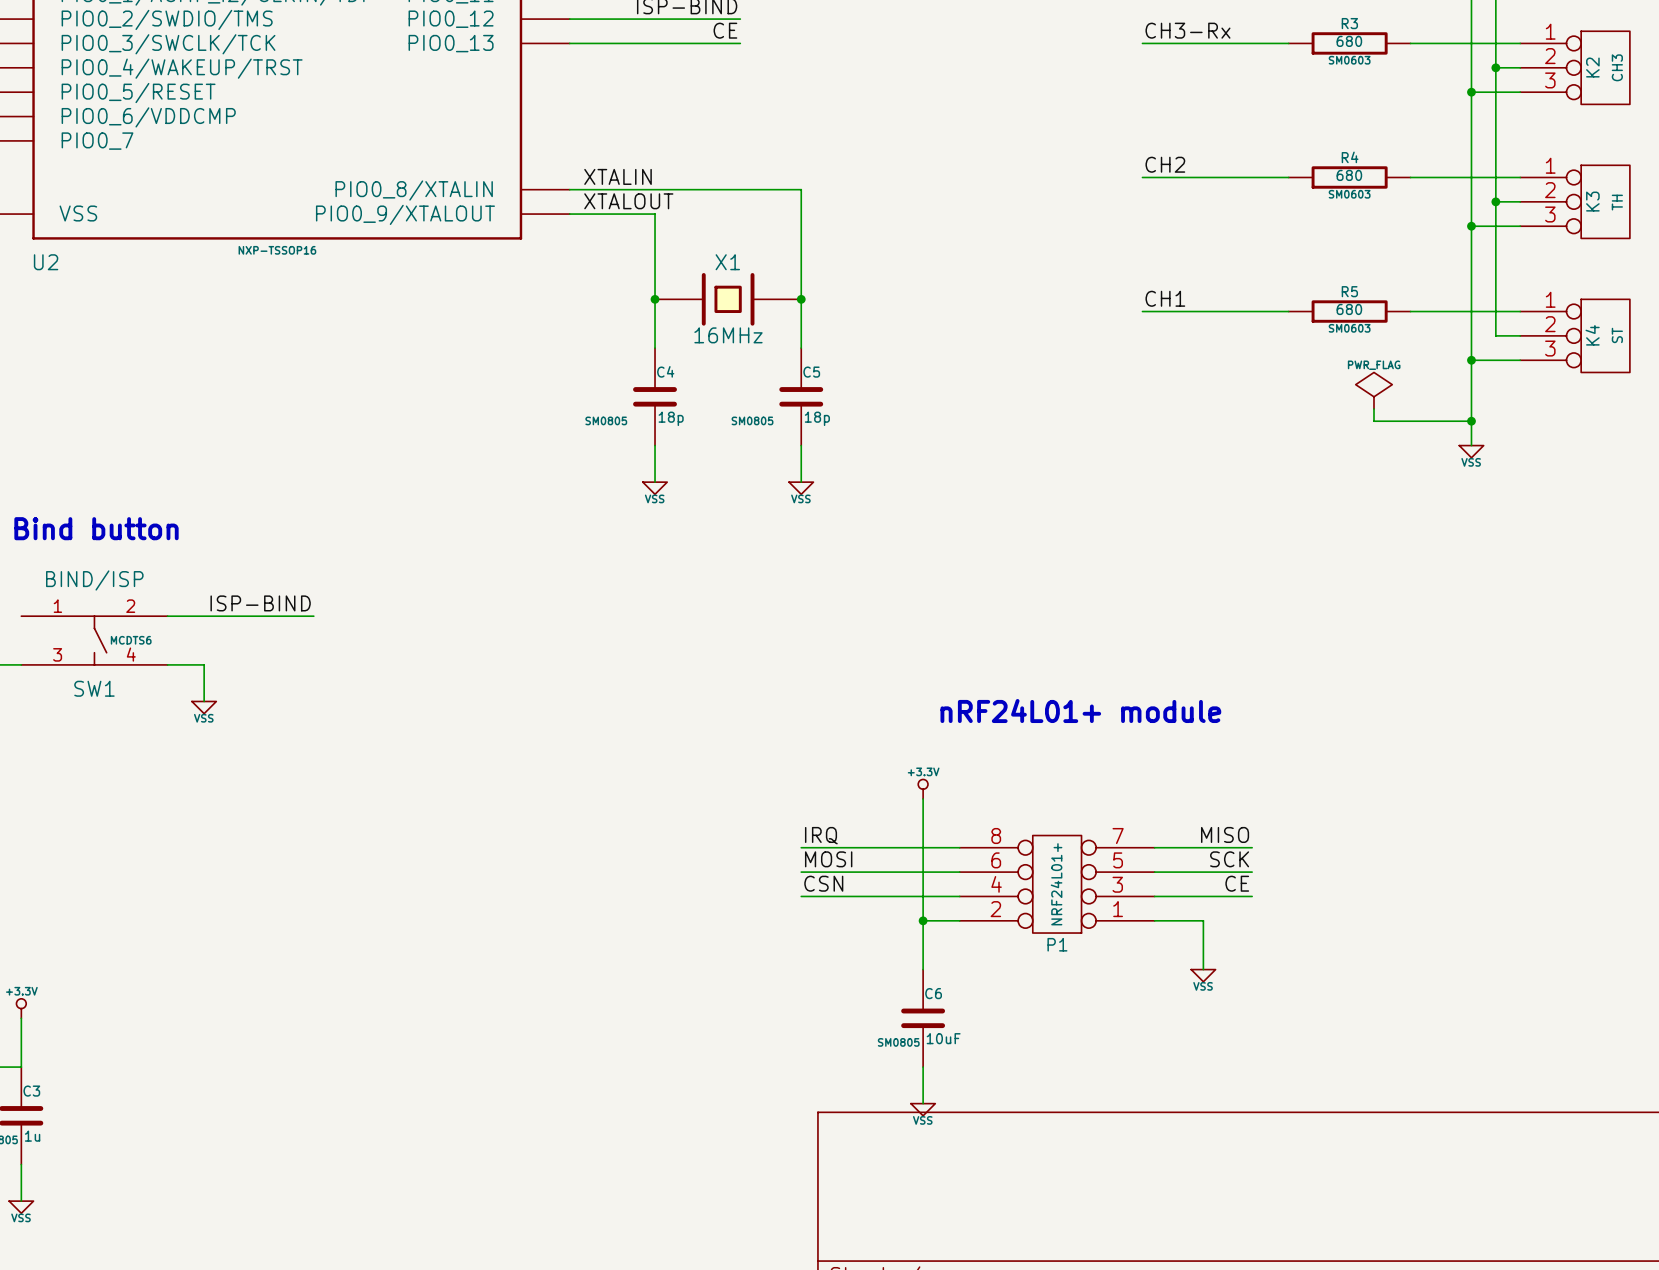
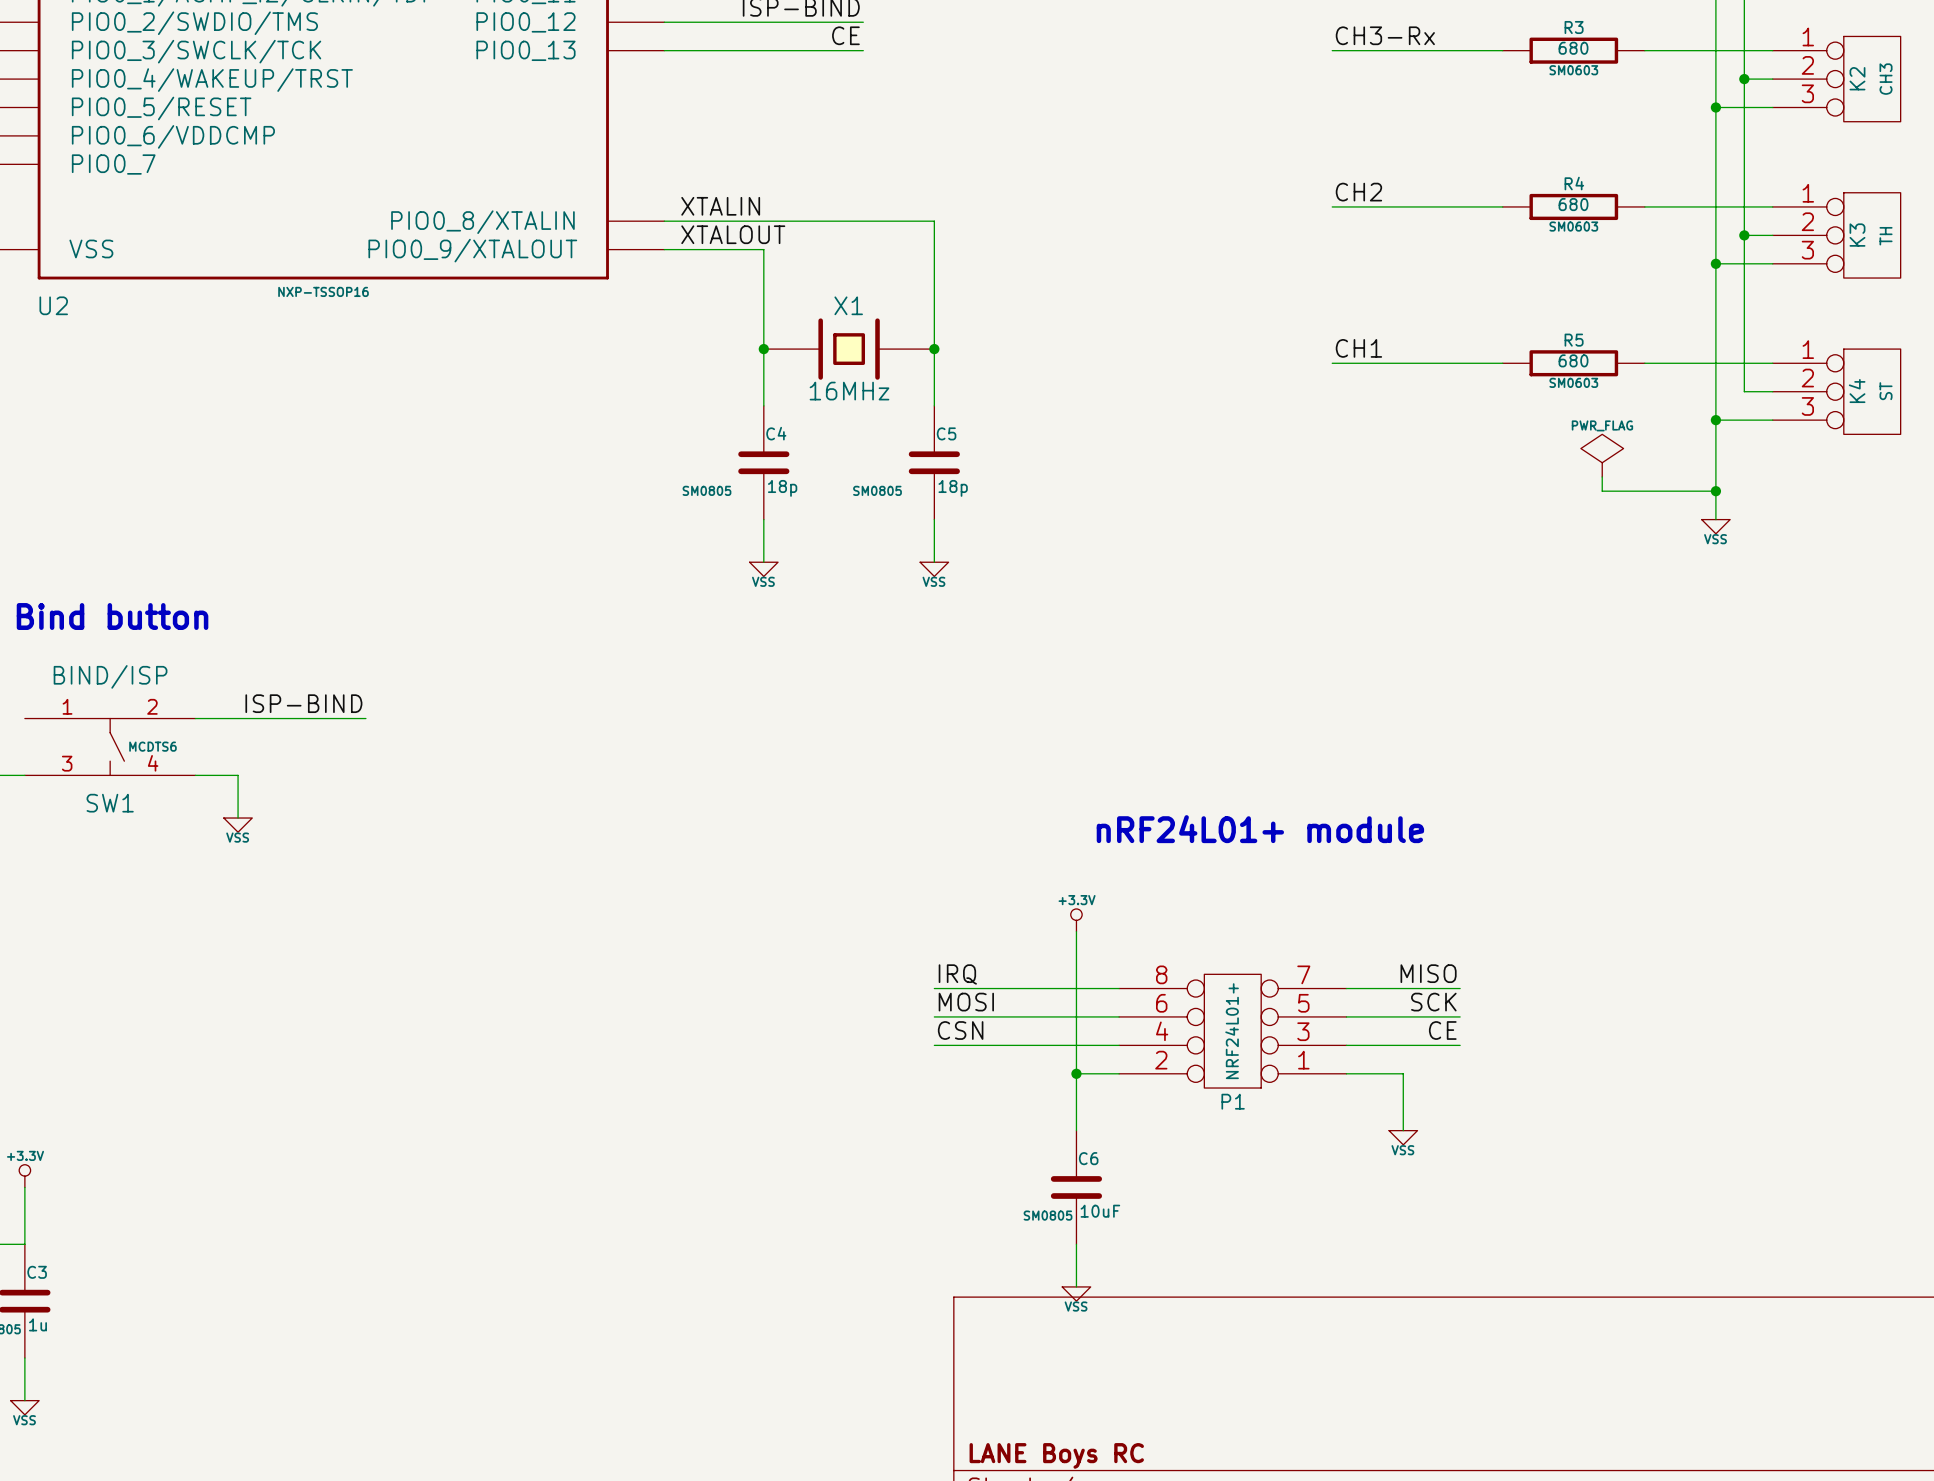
title block: none -> LANE Boys RC (1056, 1455)

